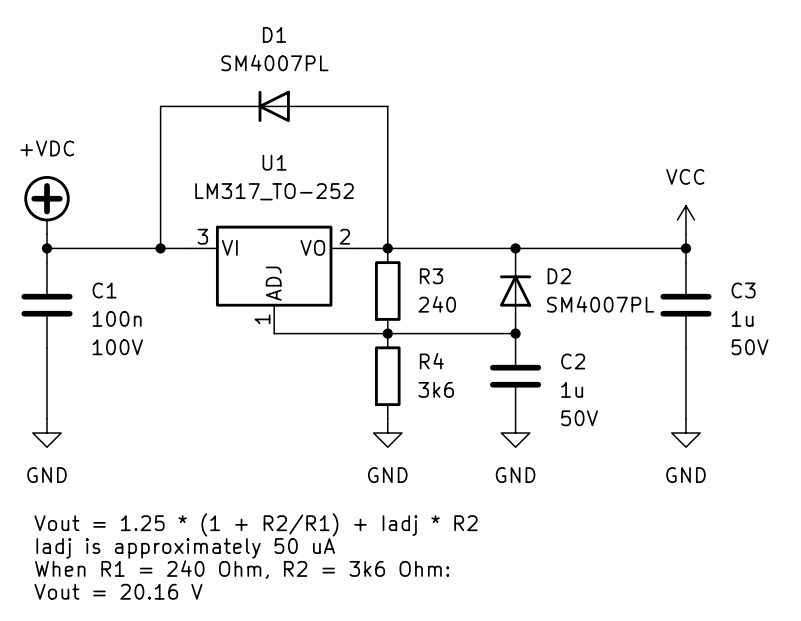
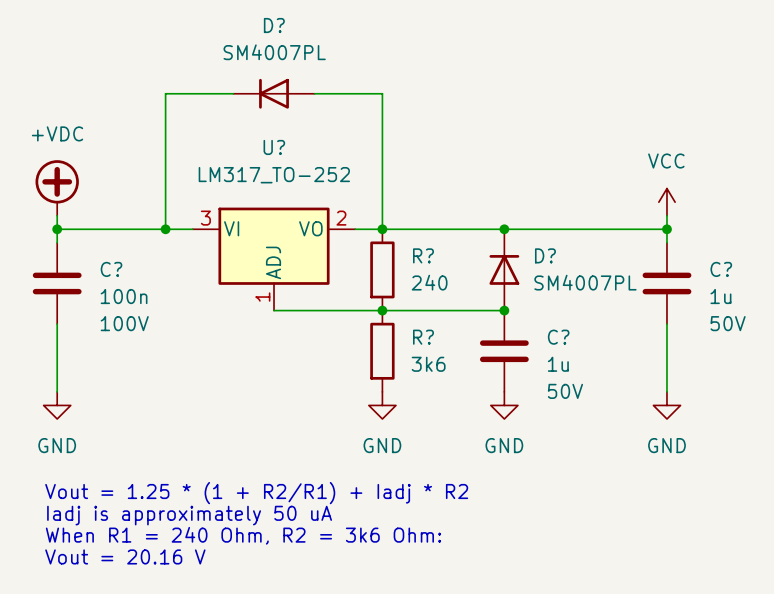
D1 name: D1 (274, 34) -> D? (274, 25)
U1 name: U1 (274, 162) -> U? (274, 147)
R3 name: R3 (431, 276) -> R? (423, 255)
D2 name: D2 (559, 276) -> D? (545, 255)
C1 name: C1 (104, 290) -> C? (111, 269)
C3 name: C3 (743, 290) -> C? (721, 269)
R4 name: R4 (431, 361) -> R? (423, 337)
C2 name: C2 (573, 361) -> C? (558, 337)

